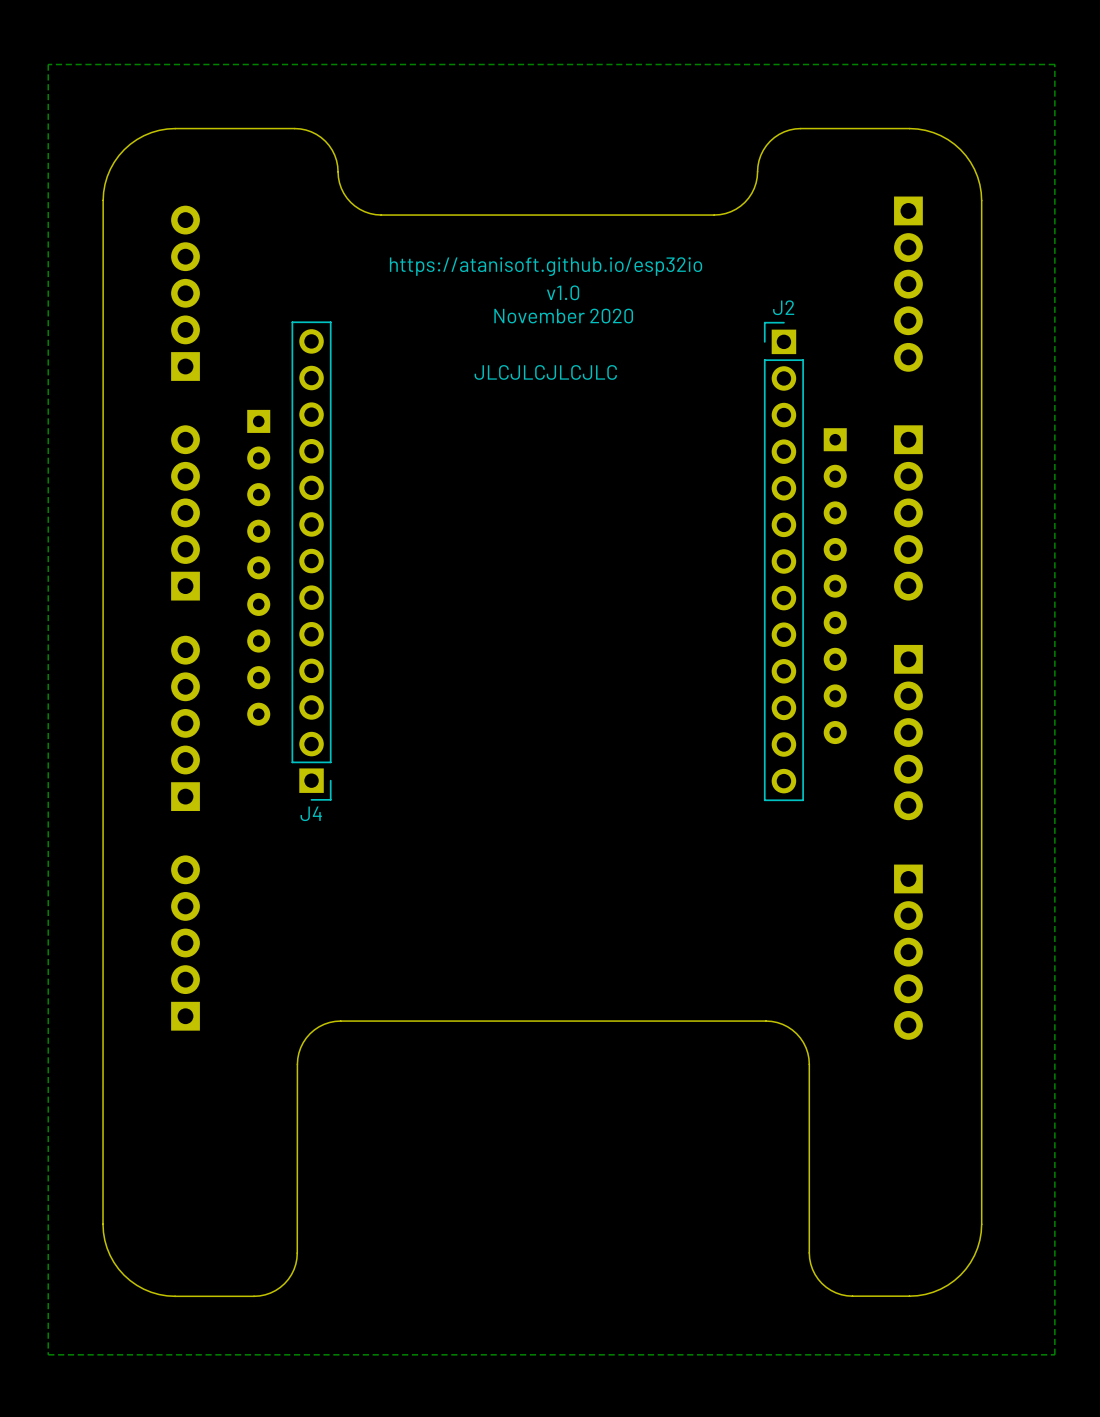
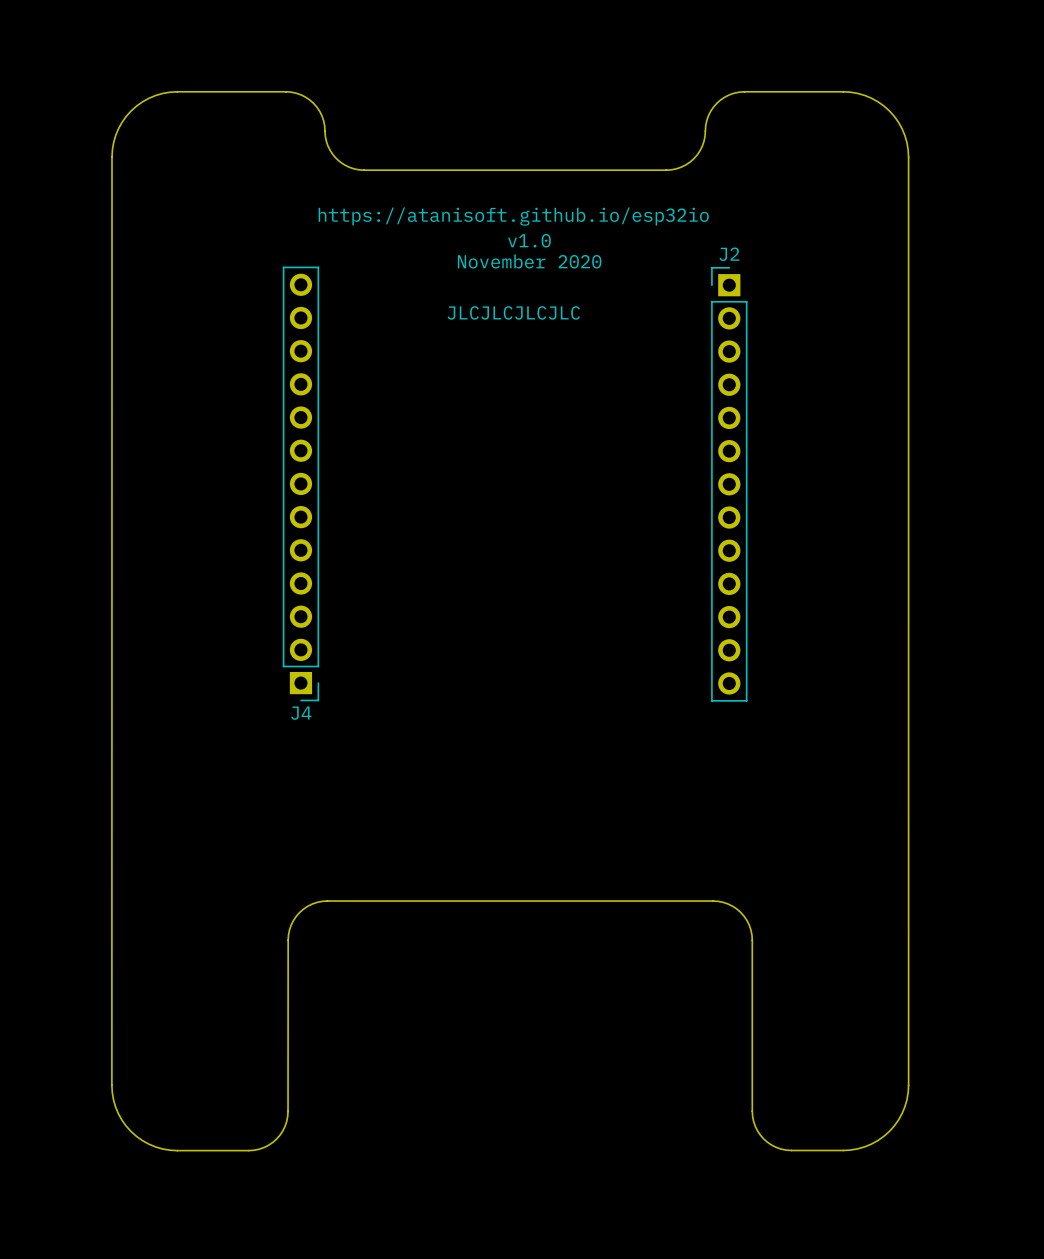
zone outline: (1054, 64) (48, 64) (48, 1354) (1054, 1354) (1054, 64) -> none
part: (908, 284) -> none
part: (185, 293) -> none
part: (185, 512) -> none
part: (908, 512) -> none
part: (258, 567) -> none
part: (835, 586) -> none
part: (185, 723) -> none
part: (908, 732) -> none
part: (185, 943) -> none
part: (908, 952) -> none

